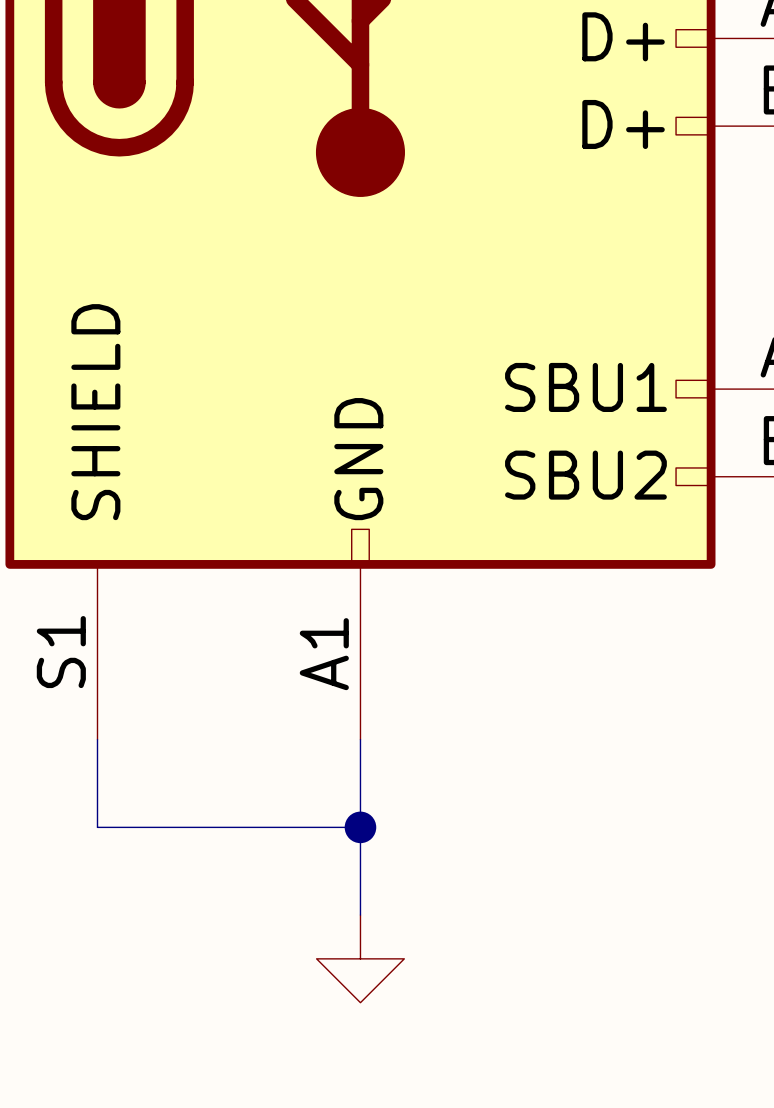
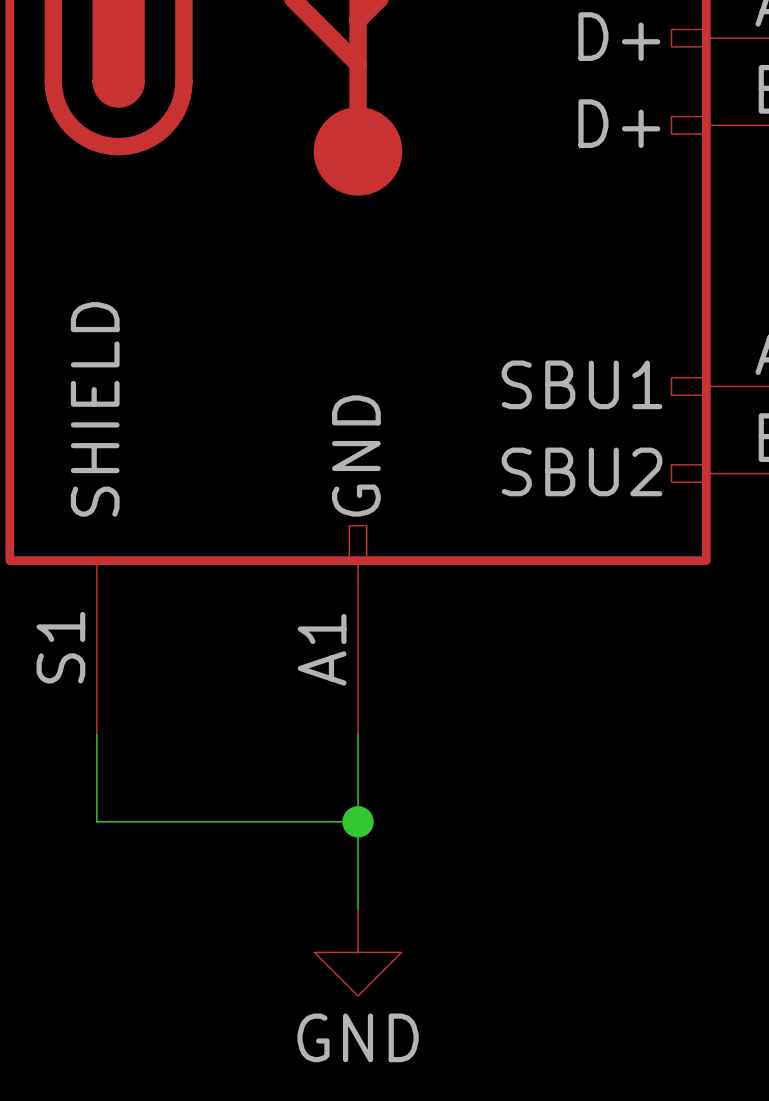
power symbol text: none -> GND (358, 1037)

